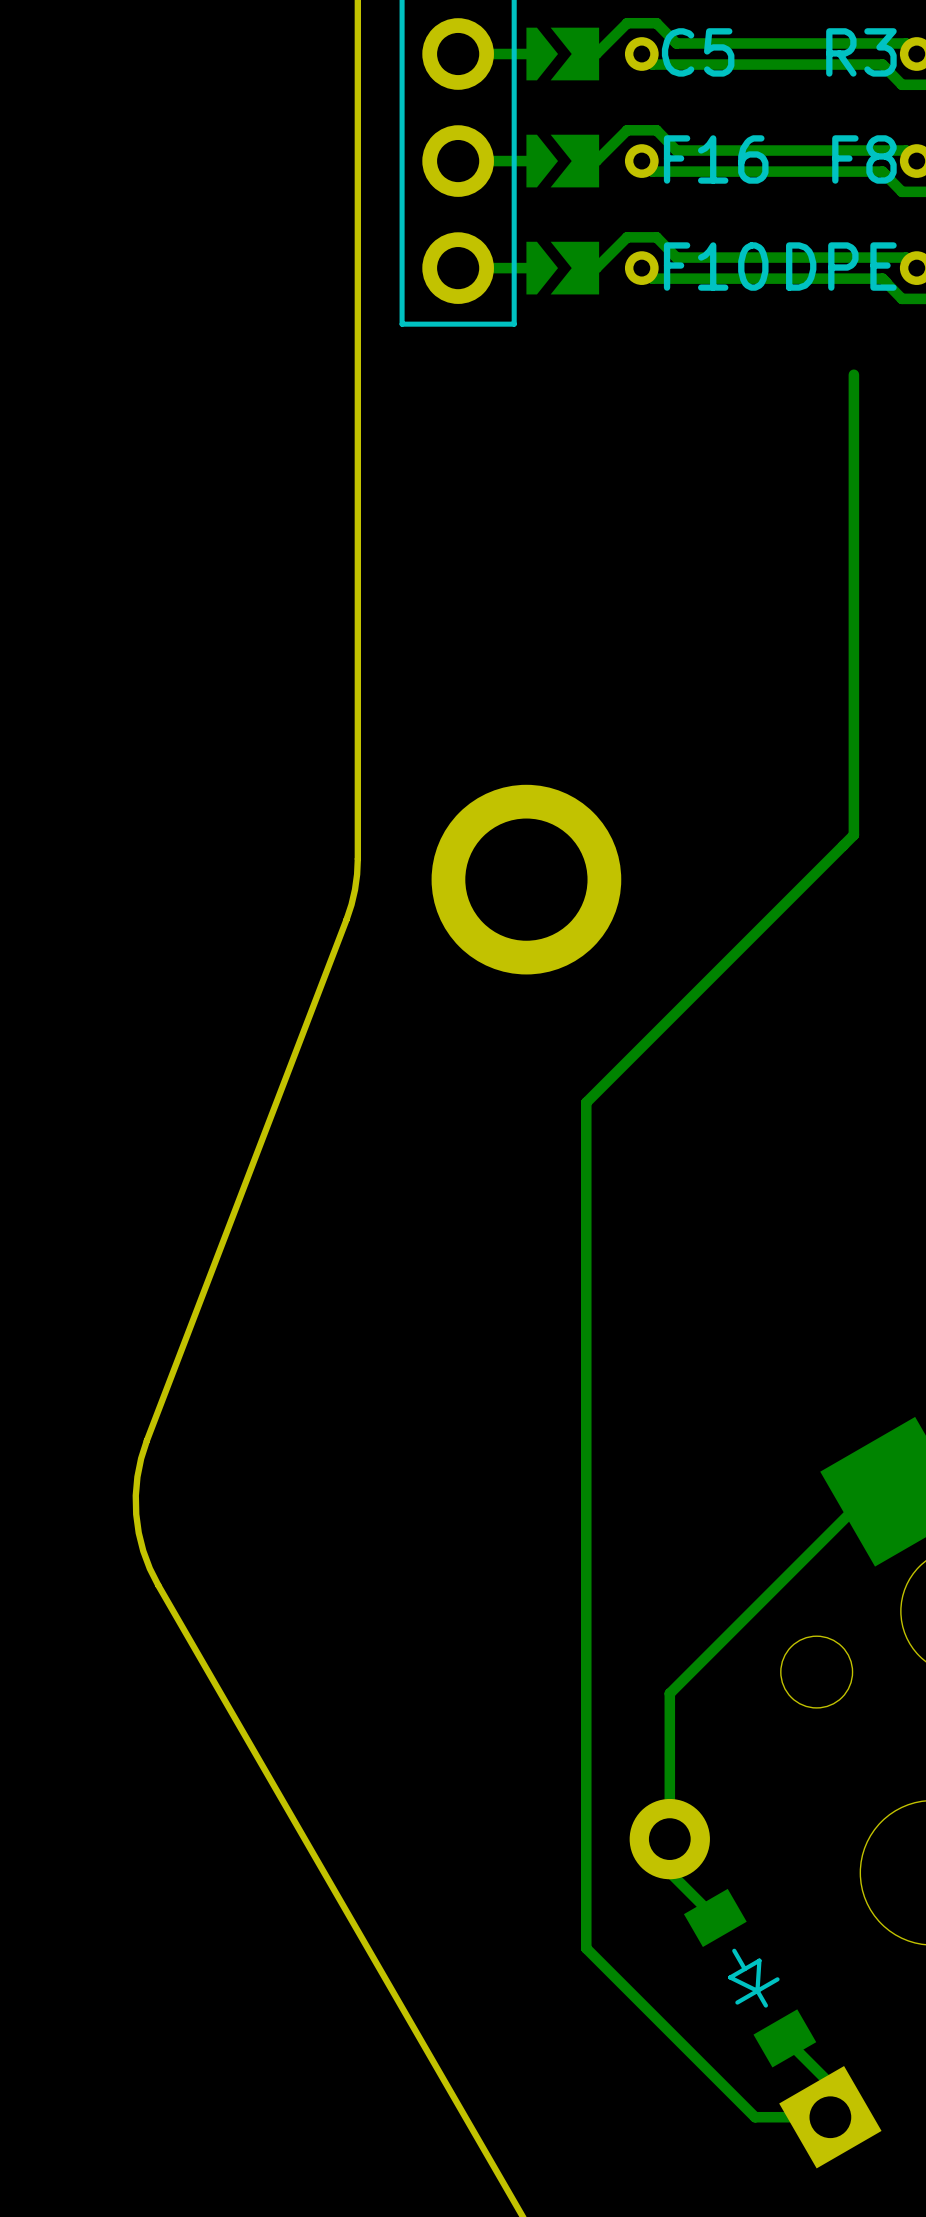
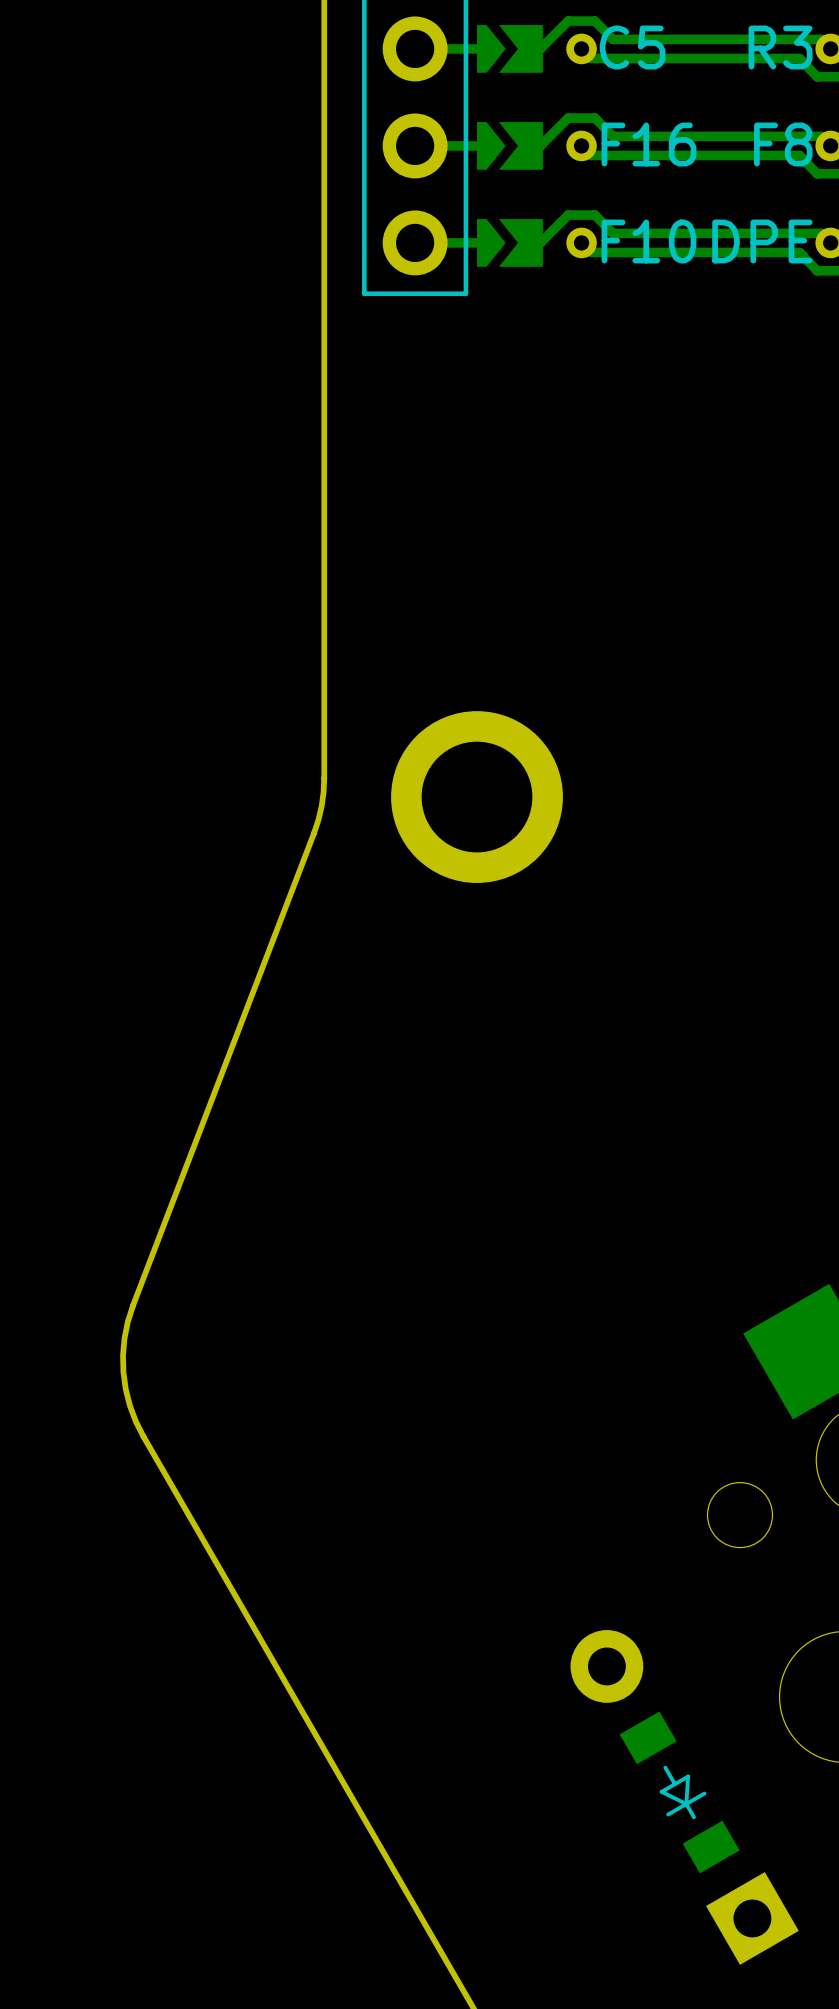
track: (853, 374) (853, 835) (586, 1102) (586, 1948) (755, 2117) (830, 2117) (830, 2083) (784, 2038) -> none
track: (895, 1491) (871, 1491) (669, 1693) (669, 1872) (715, 1917) -> none

